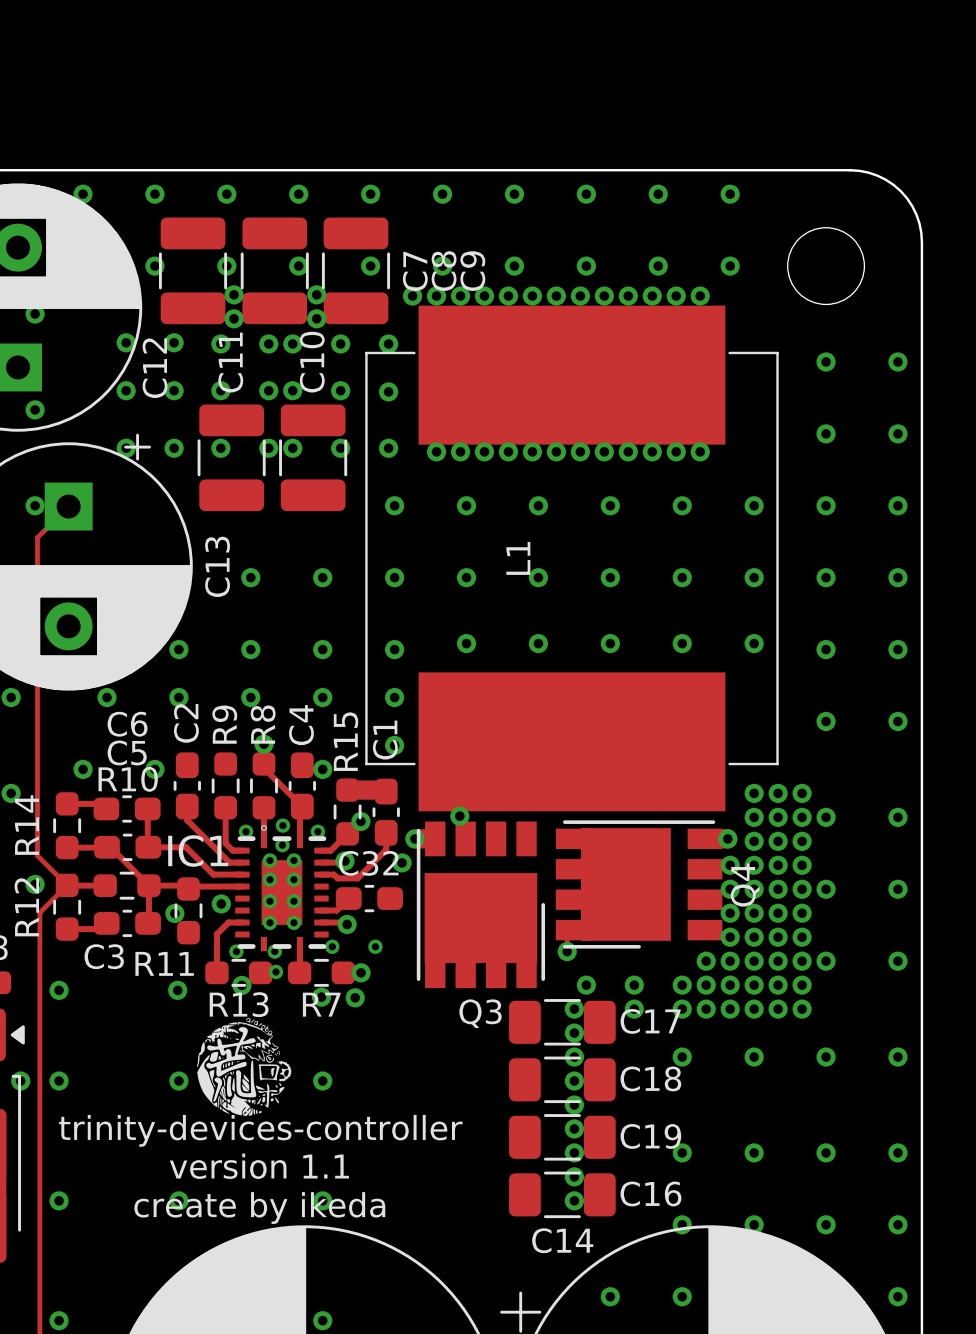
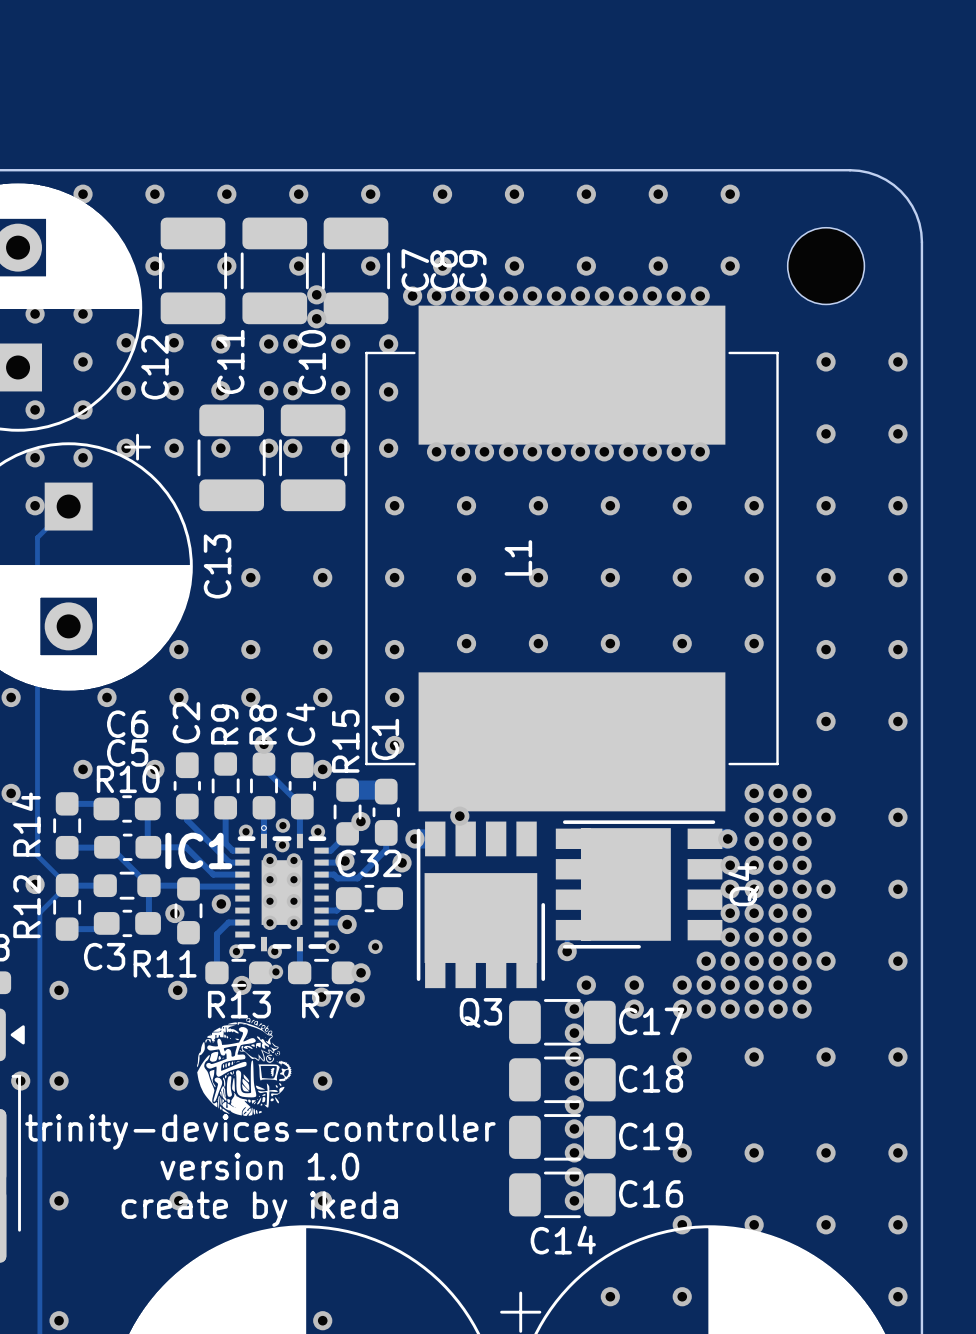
via: (234, 294) -> none
via: none -> (83, 314)
via: (234, 318) -> none
via: none -> (83, 361)
via: none -> (83, 409)
via: none -> (35, 457)
via: none -> (83, 457)
text: version 1.1 (259, 1166) -> version 1.0 (259, 1166)

